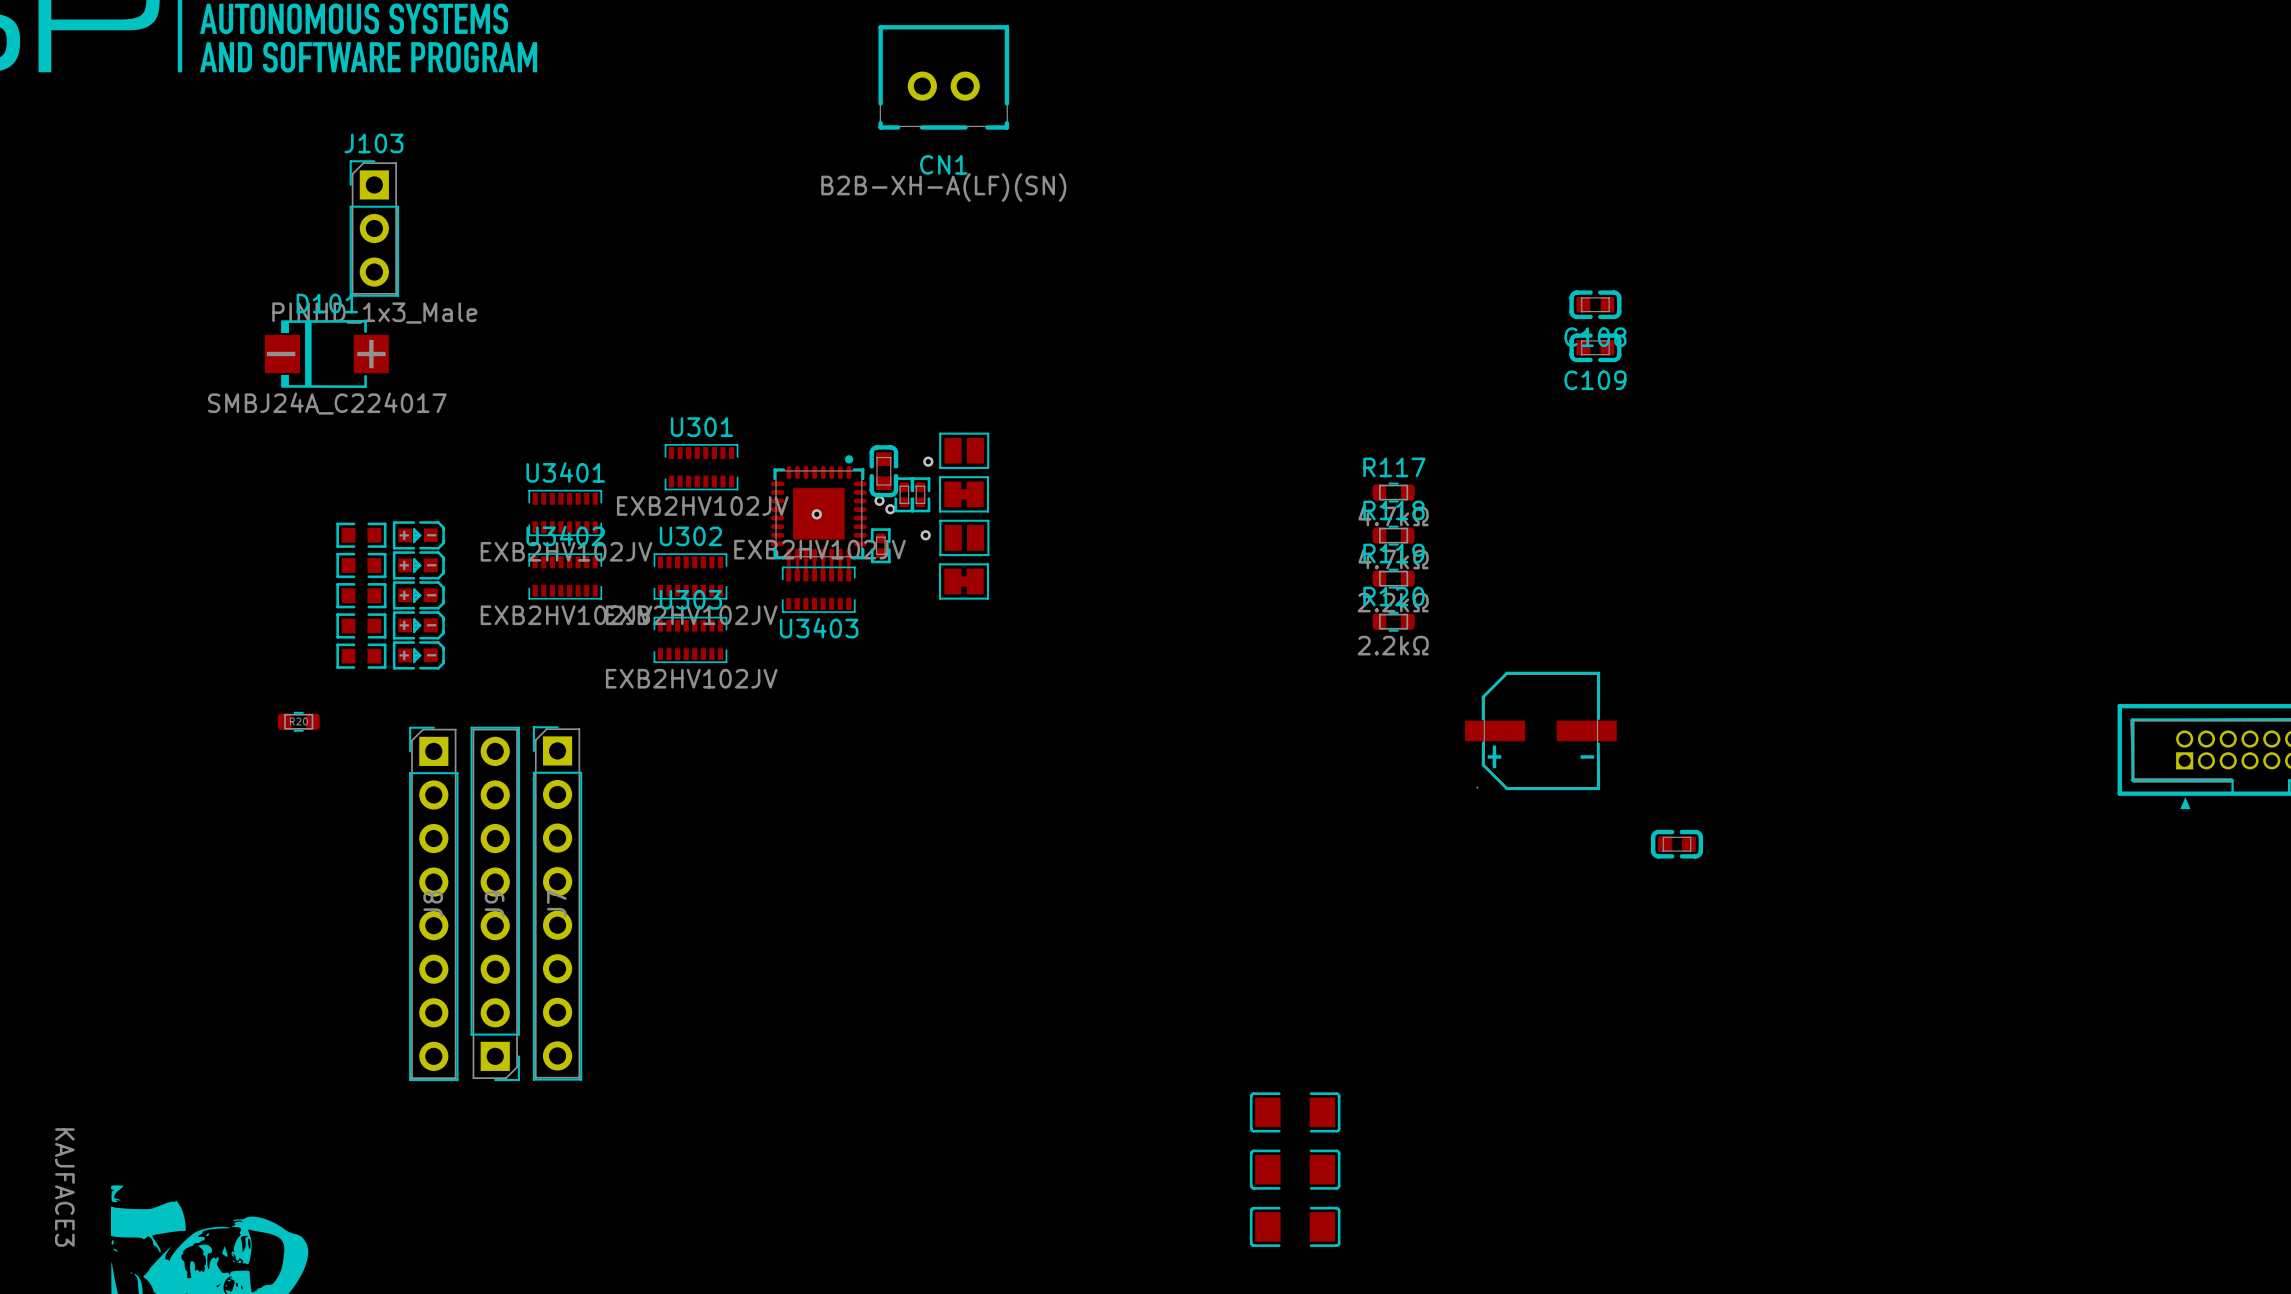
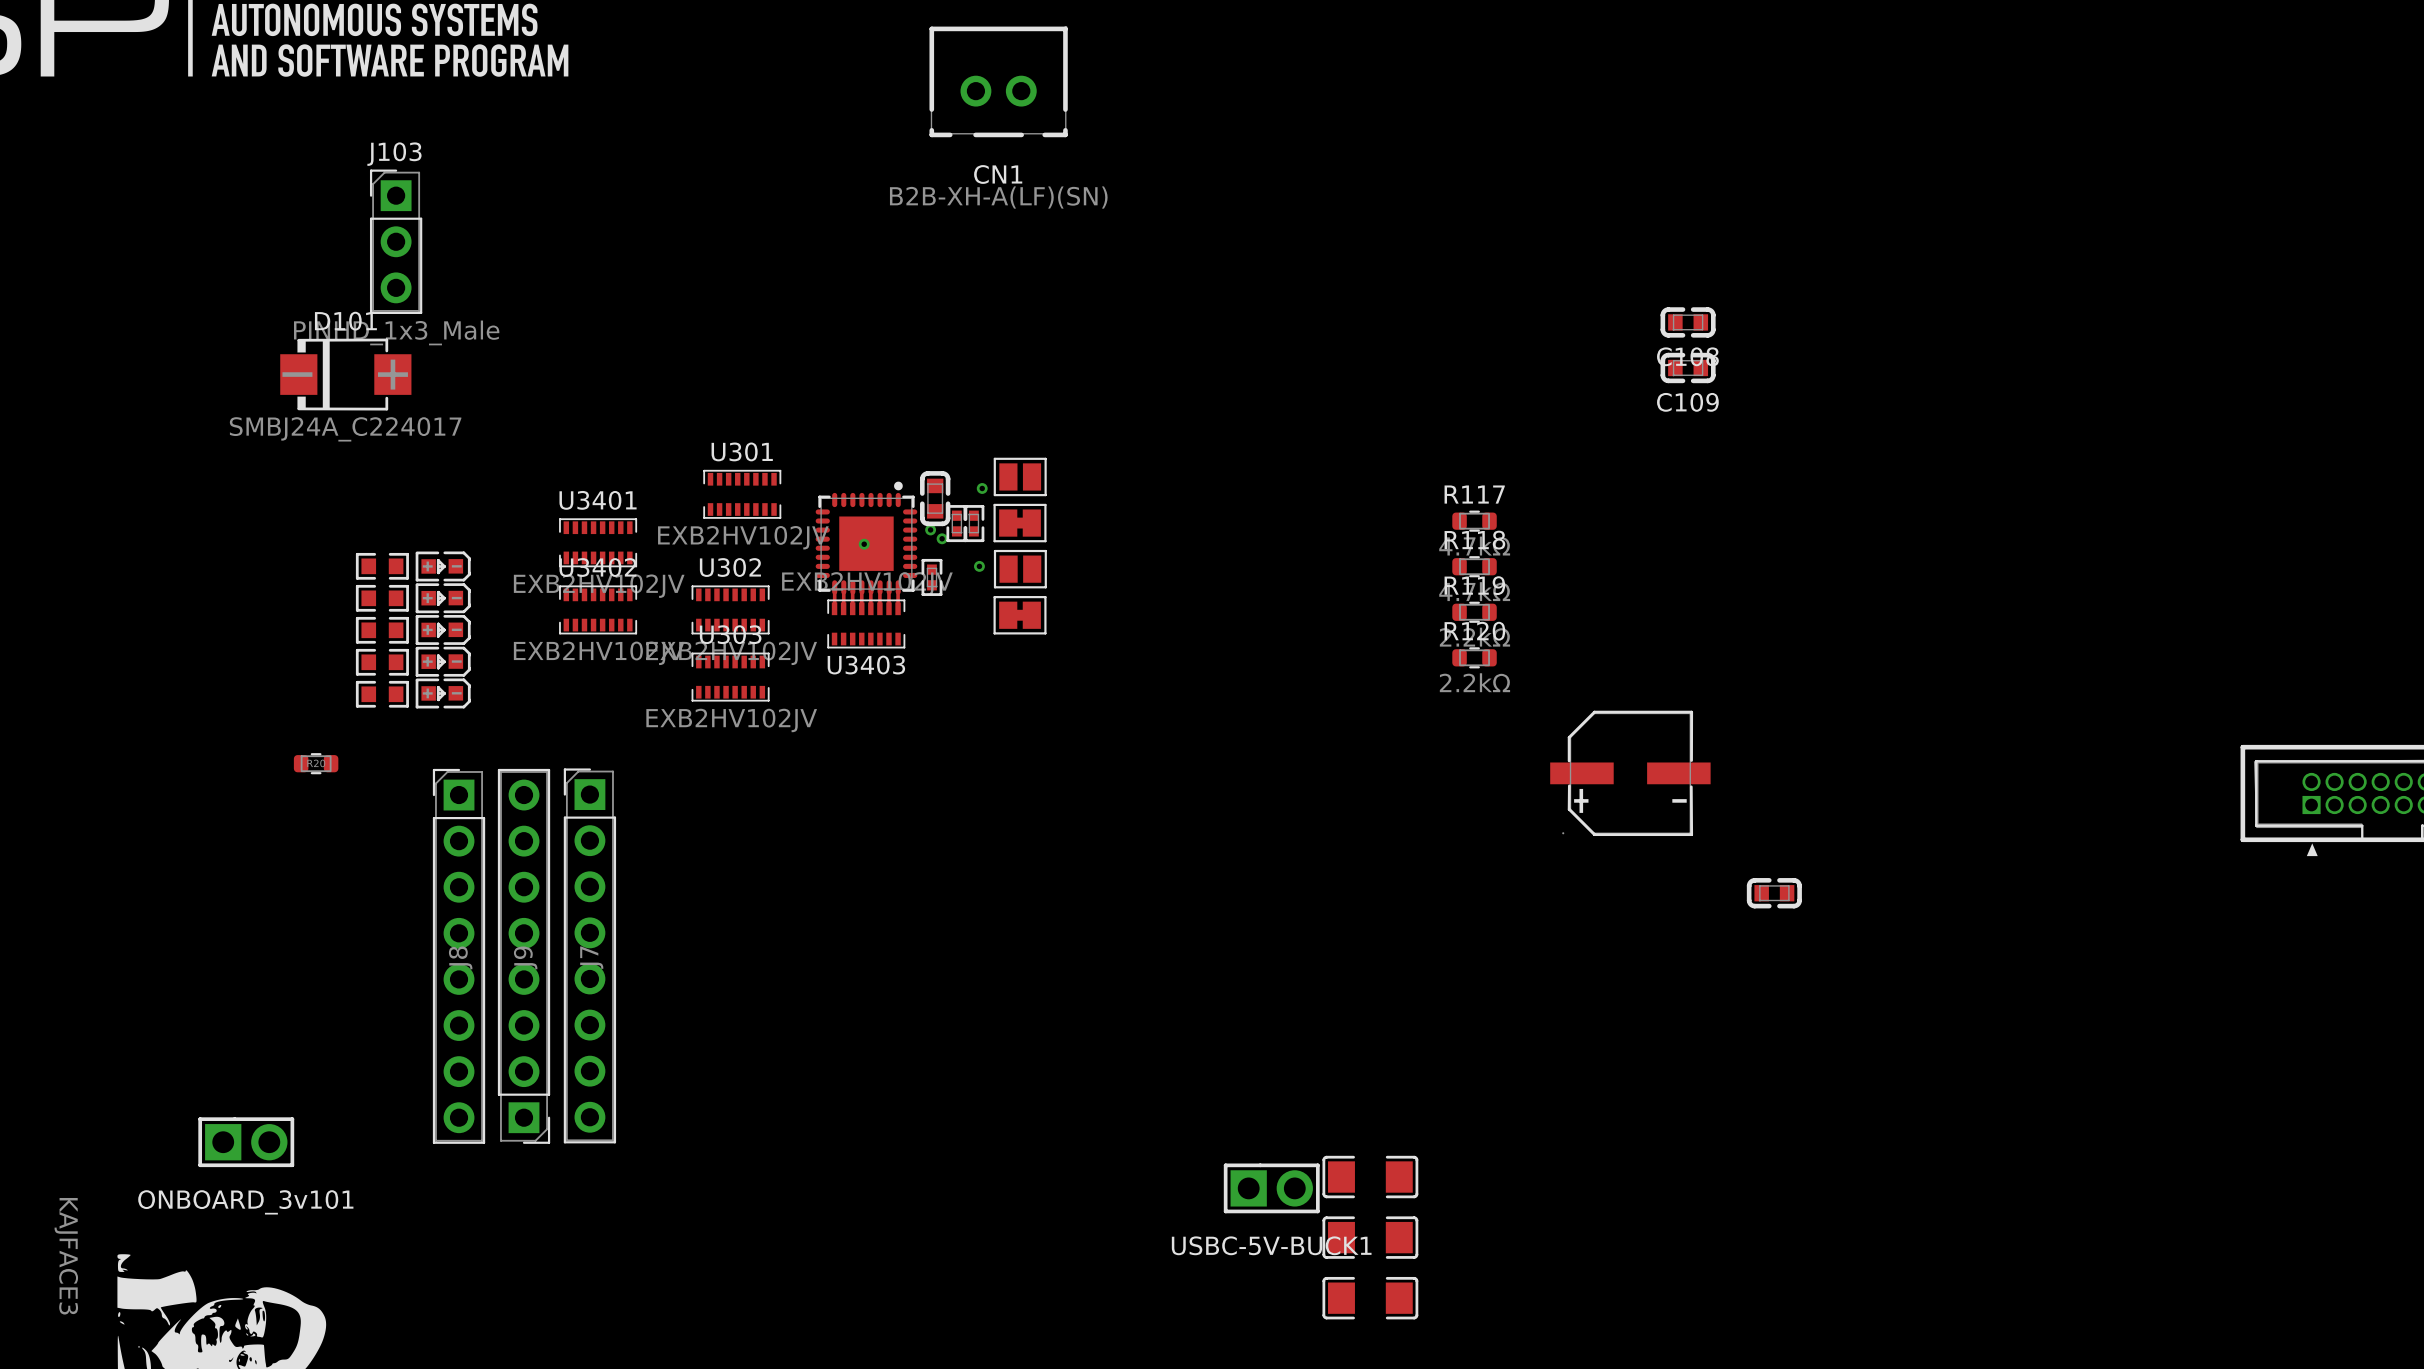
ONBOARD_3v101: none -> (246, 1142)
USBC-5V-BUCK1: none -> (1271, 1188)

